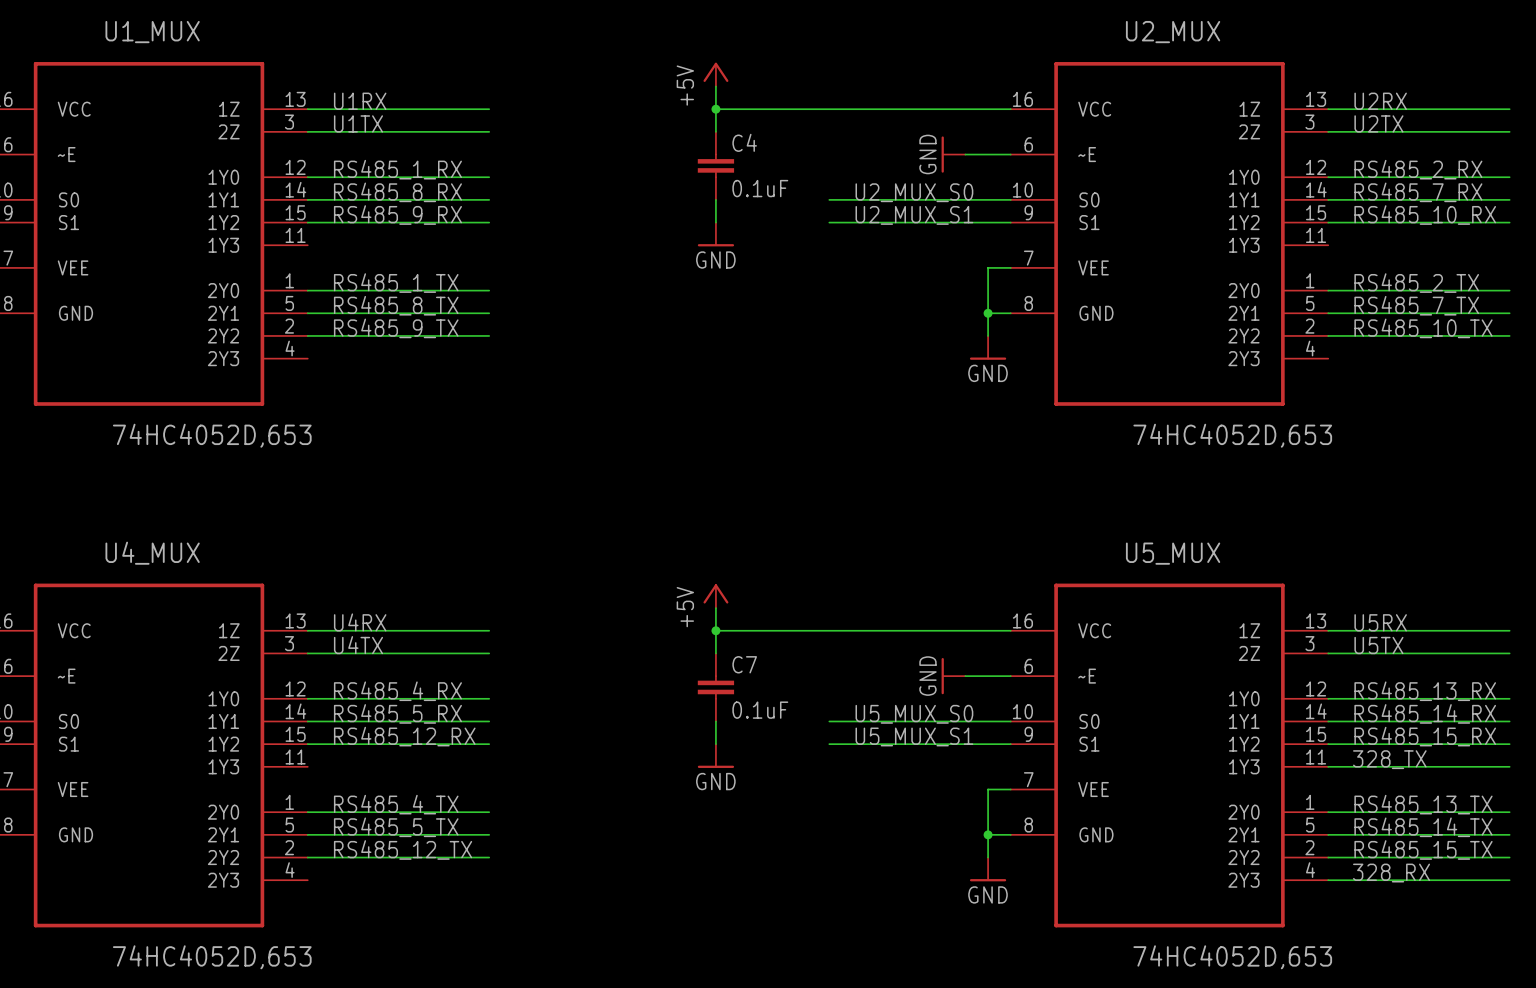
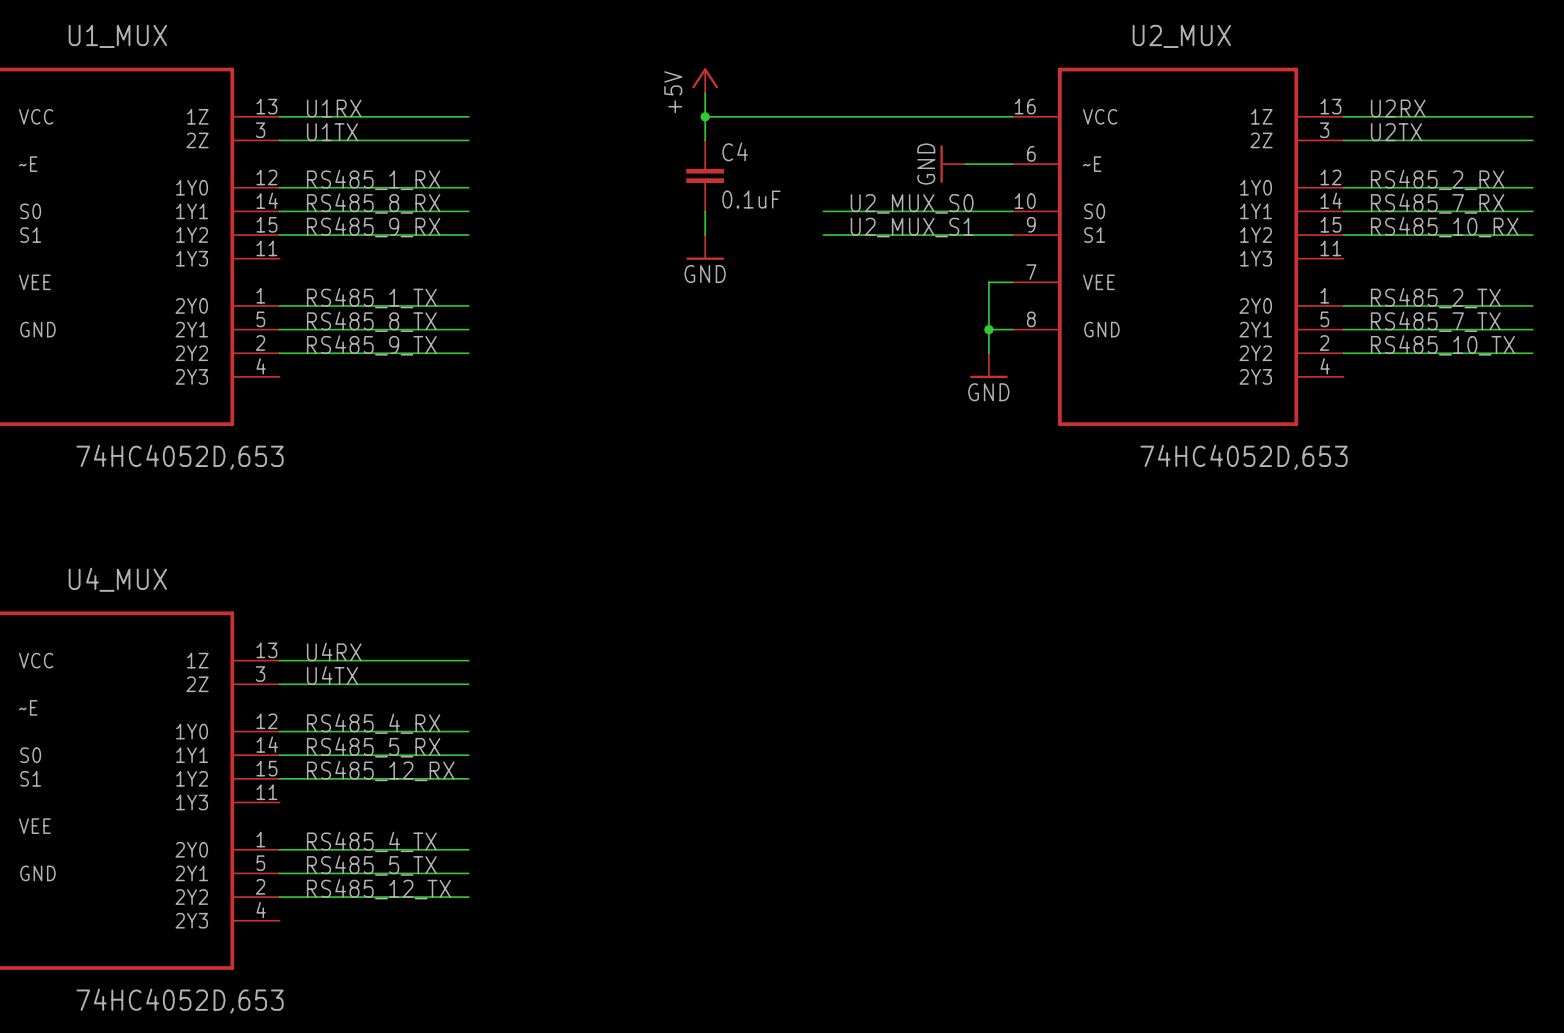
power symbol: +5V (715, 596) -> none
wire: (715, 608) (715, 653) -> none
label: U5RX (1380, 622) -> none
wire: (715, 630) (1010, 630) -> none
junction: (715, 630) -> none
wire: (1328, 630) (1509, 630) -> none
label: U5TX (1378, 645) -> none
wire: (1328, 653) (1509, 653) -> none
power symbol: GND (953, 676) -> none
wire: (965, 676) (1010, 676) -> none
C7: 0.1uF (715, 687) -> none
label: RS485_13_RX (1425, 691) -> none
wire: (1328, 698) (1509, 698) -> none
label: RS485_14_RX (1425, 713) -> none
label: U5_MUX_S0 (914, 714) -> none
wire: (715, 721) (715, 744) -> none
wire: (829, 721) (1010, 721) -> none
wire: (1328, 721) (1509, 721) -> none
label: U5_MUX_S1 (914, 736) -> none
label: RS485_15_RX (1425, 736) -> none
wire: (829, 744) (1010, 744) -> none
wire: (1328, 744) (1509, 744) -> none
U5_MUX: 74HC4052D,653 (1169, 755) -> none
power symbol: GND (715, 756) -> none
label: 328_TX (1389, 759) -> none
wire: (1328, 766) (1509, 766) -> none
wire: (1010, 789) (988, 789) (988, 857) -> none
label: RS485_13_TX (1423, 804) -> none
wire: (1328, 812) (1509, 812) -> none
label: RS485_14_TX (1423, 827) -> none
wire: (988, 834) (1010, 834) -> none
junction: (988, 834) -> none
wire: (1328, 834) (1509, 834) -> none
label: RS485_15_TX (1423, 849) -> none
wire: (1328, 857) (1509, 857) -> none
power symbol: GND (988, 869) -> none
label: 328_RX (1391, 873) -> none
wire: (1328, 880) (1509, 880) -> none

